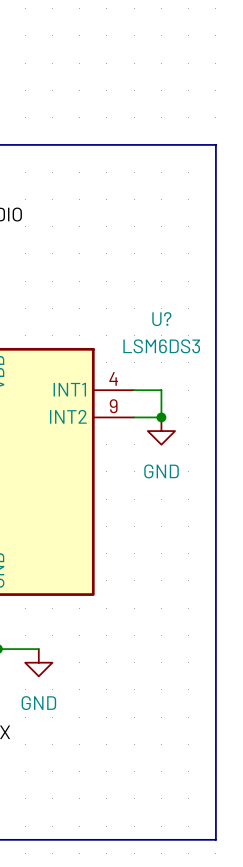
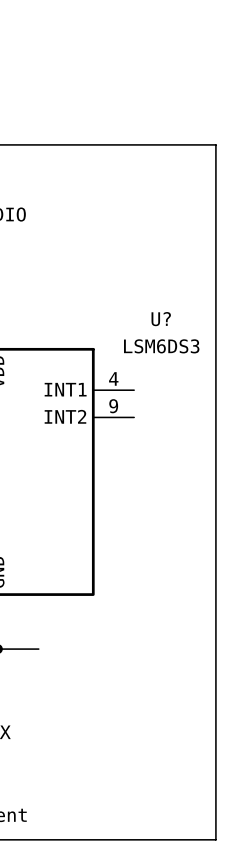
wire: (134, 390) (161, 390) (161, 417) (134, 417) -> none
junction: (161, 417) -> none
power symbol: GND (161, 431) -> none
power symbol: GND (38, 662) -> none

